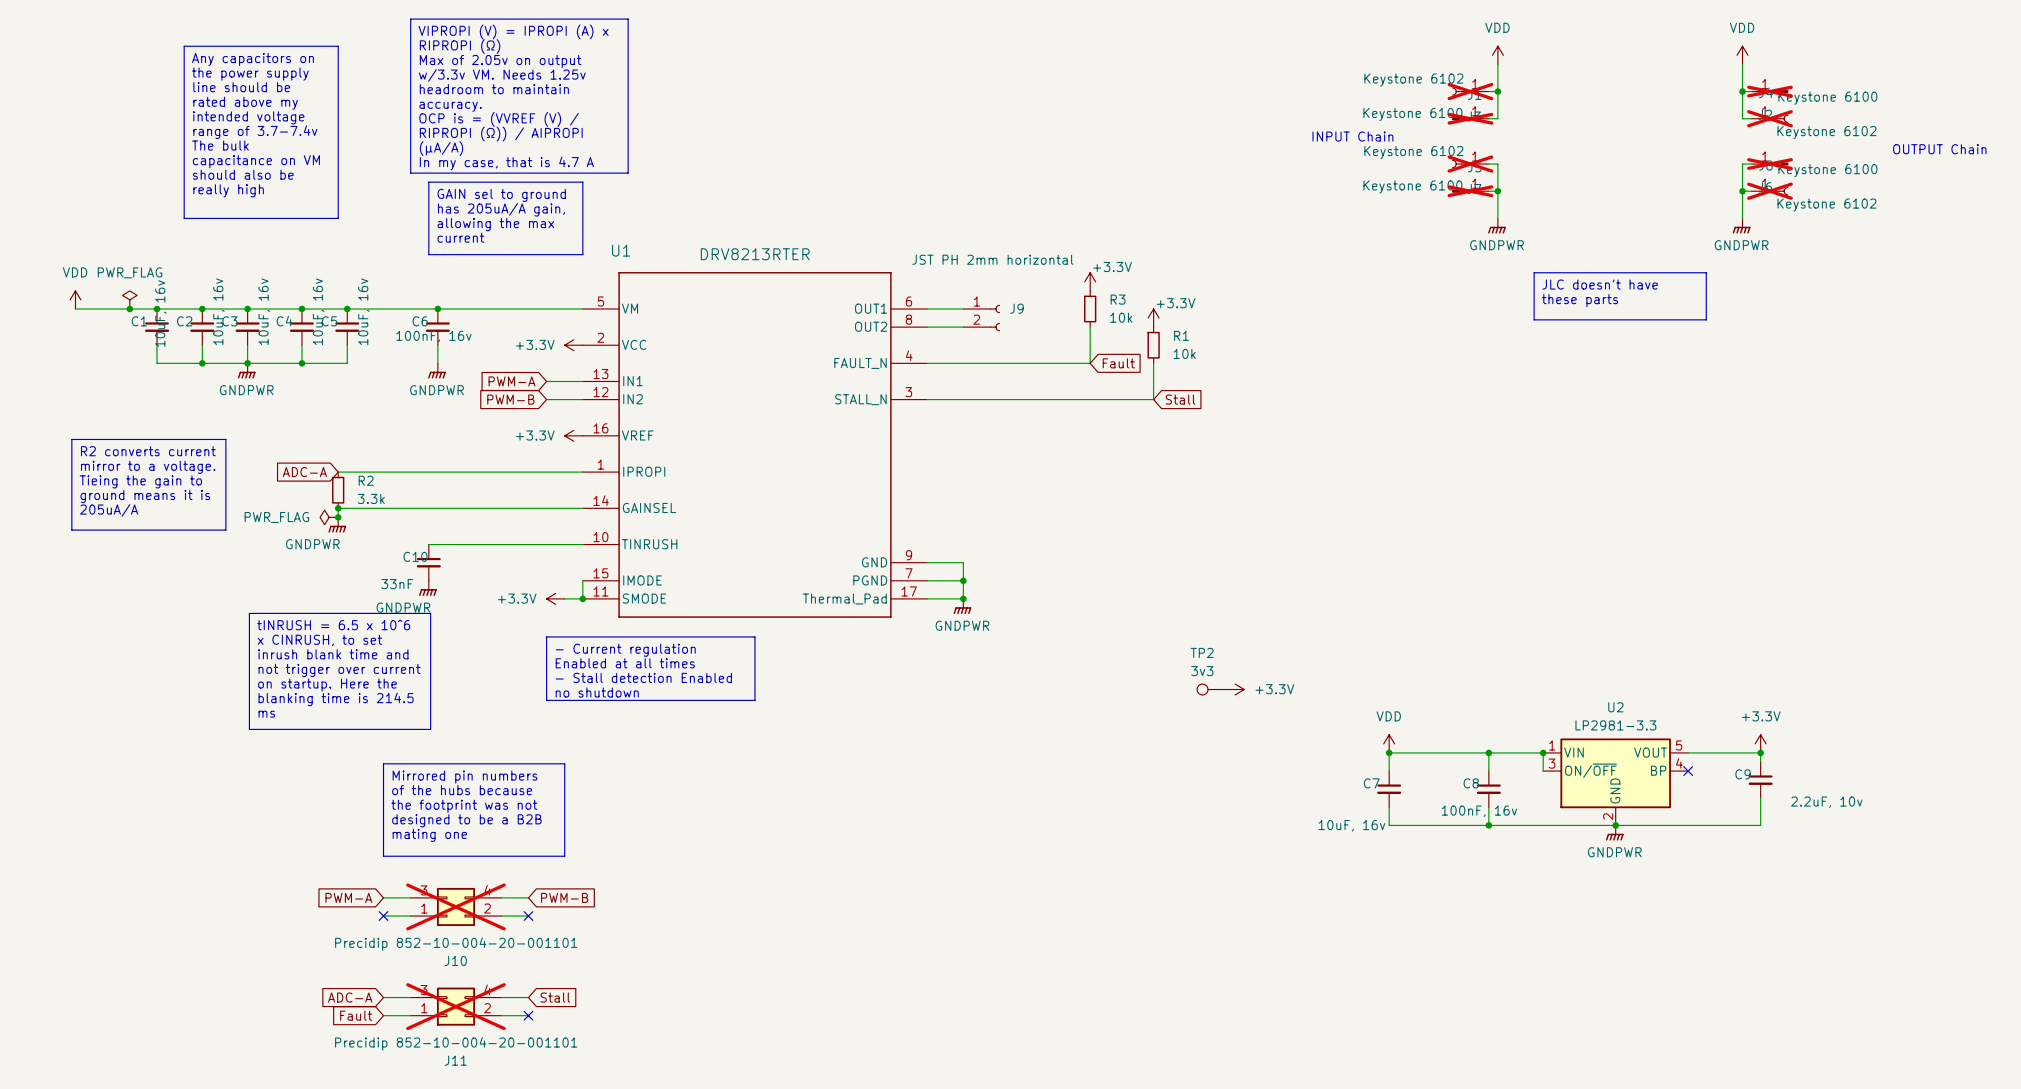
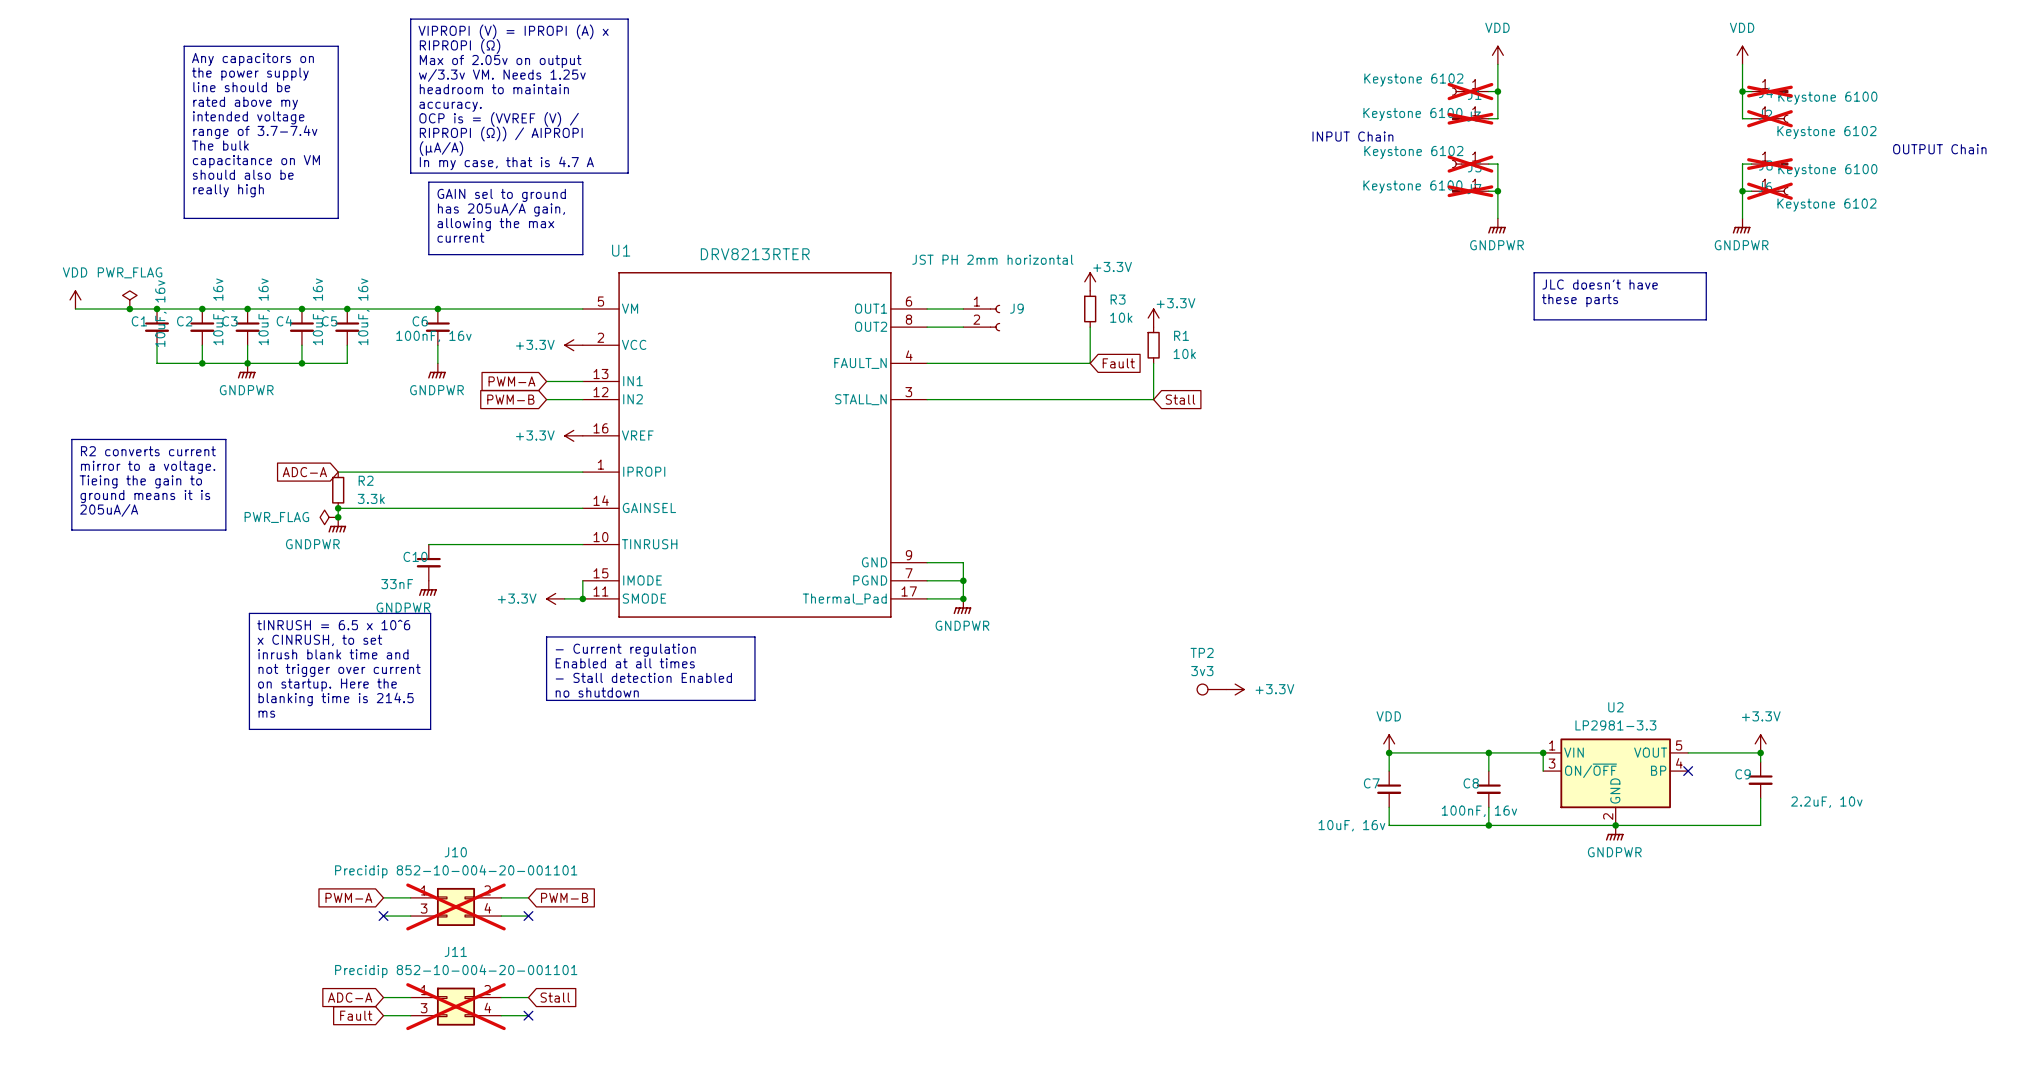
line: (383, 763) (564, 763) (564, 856) (383, 856) (383, 763) -> none
text: Mirrored pin numbers (465, 777) -> none
text: of the hubs because (462, 790) -> none
text: the footprint was not (464, 806) -> none
text: designed to be a B2B (466, 820) -> none
text: mating one (429, 835) -> none
J10 flip: as is (455, 906) -> up-down (455, 906)
J11 flip: as is (455, 1006) -> up-down (455, 1006)

